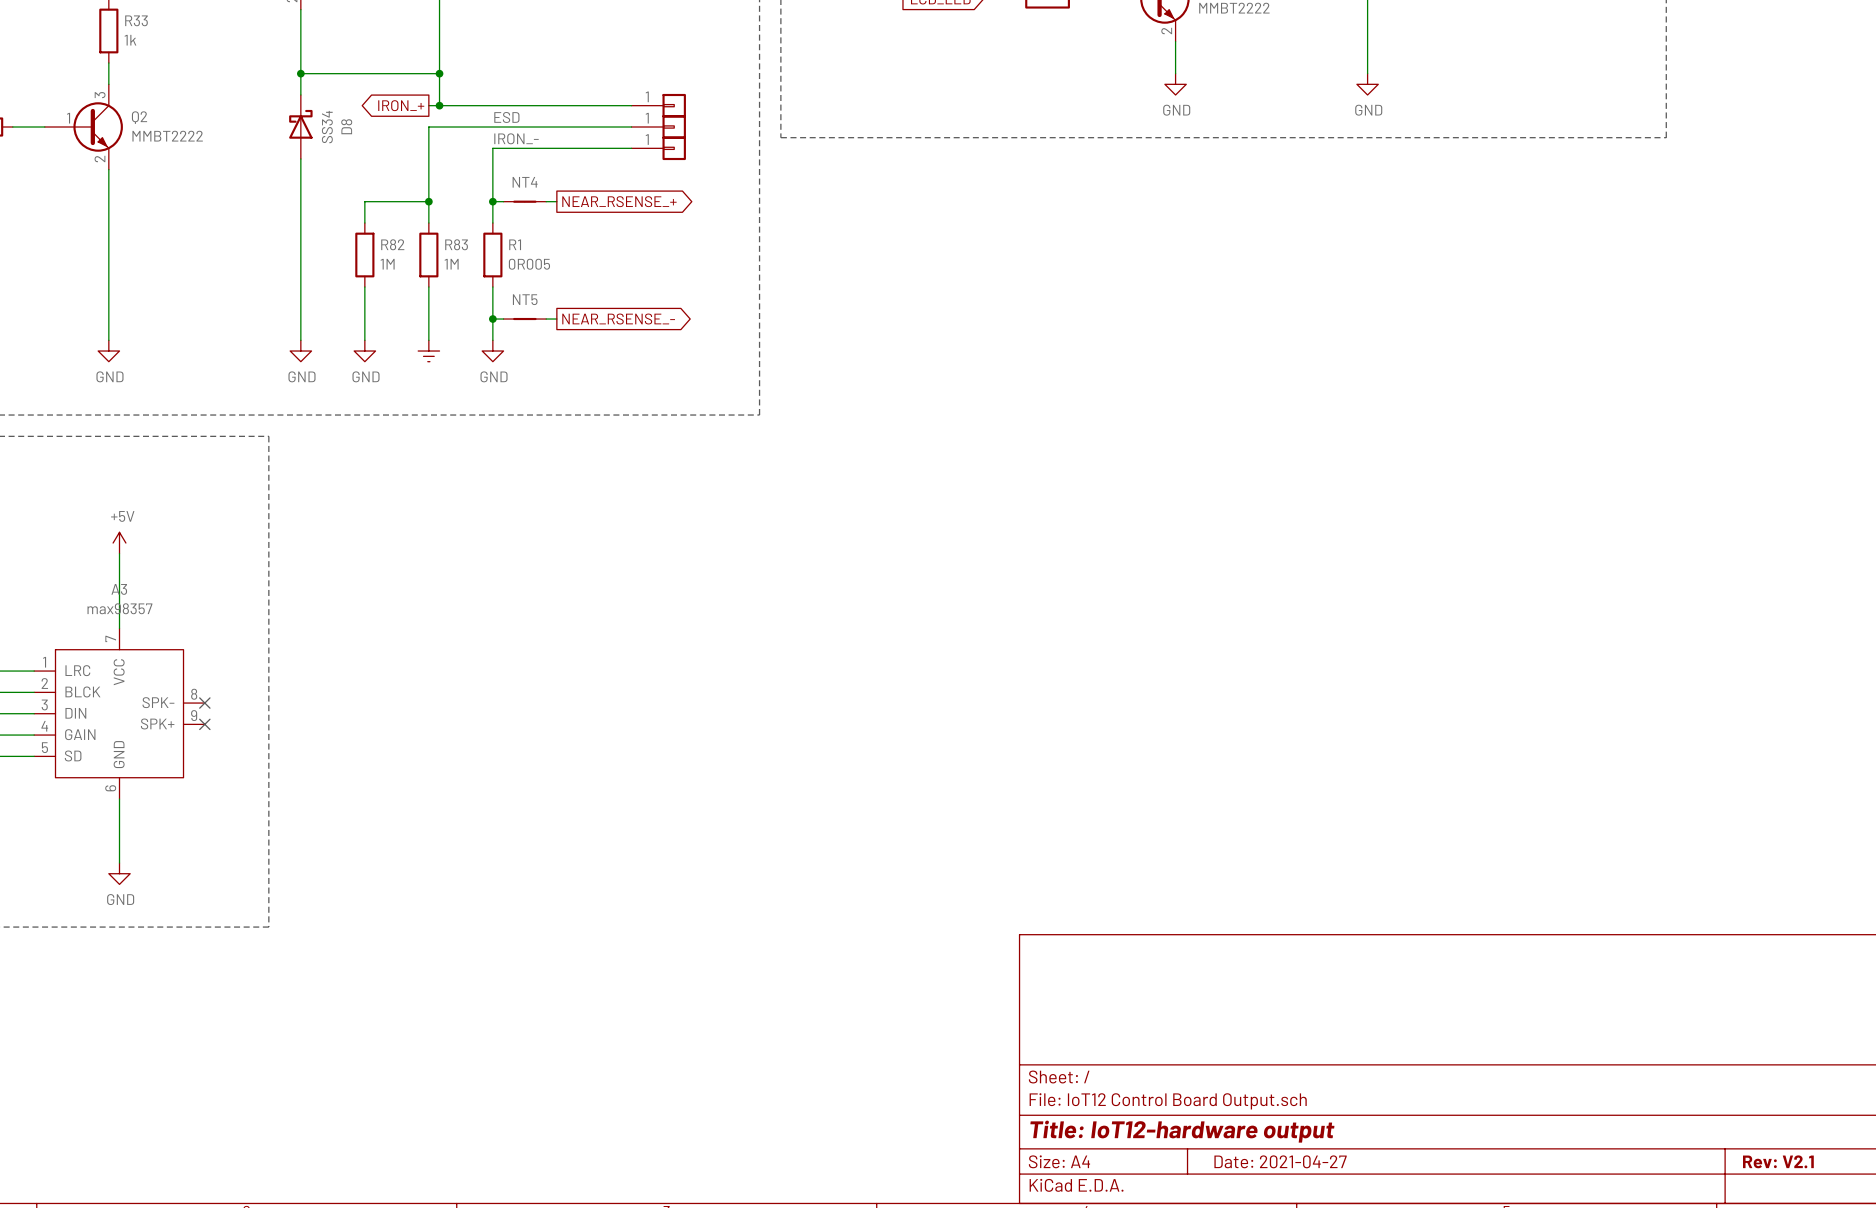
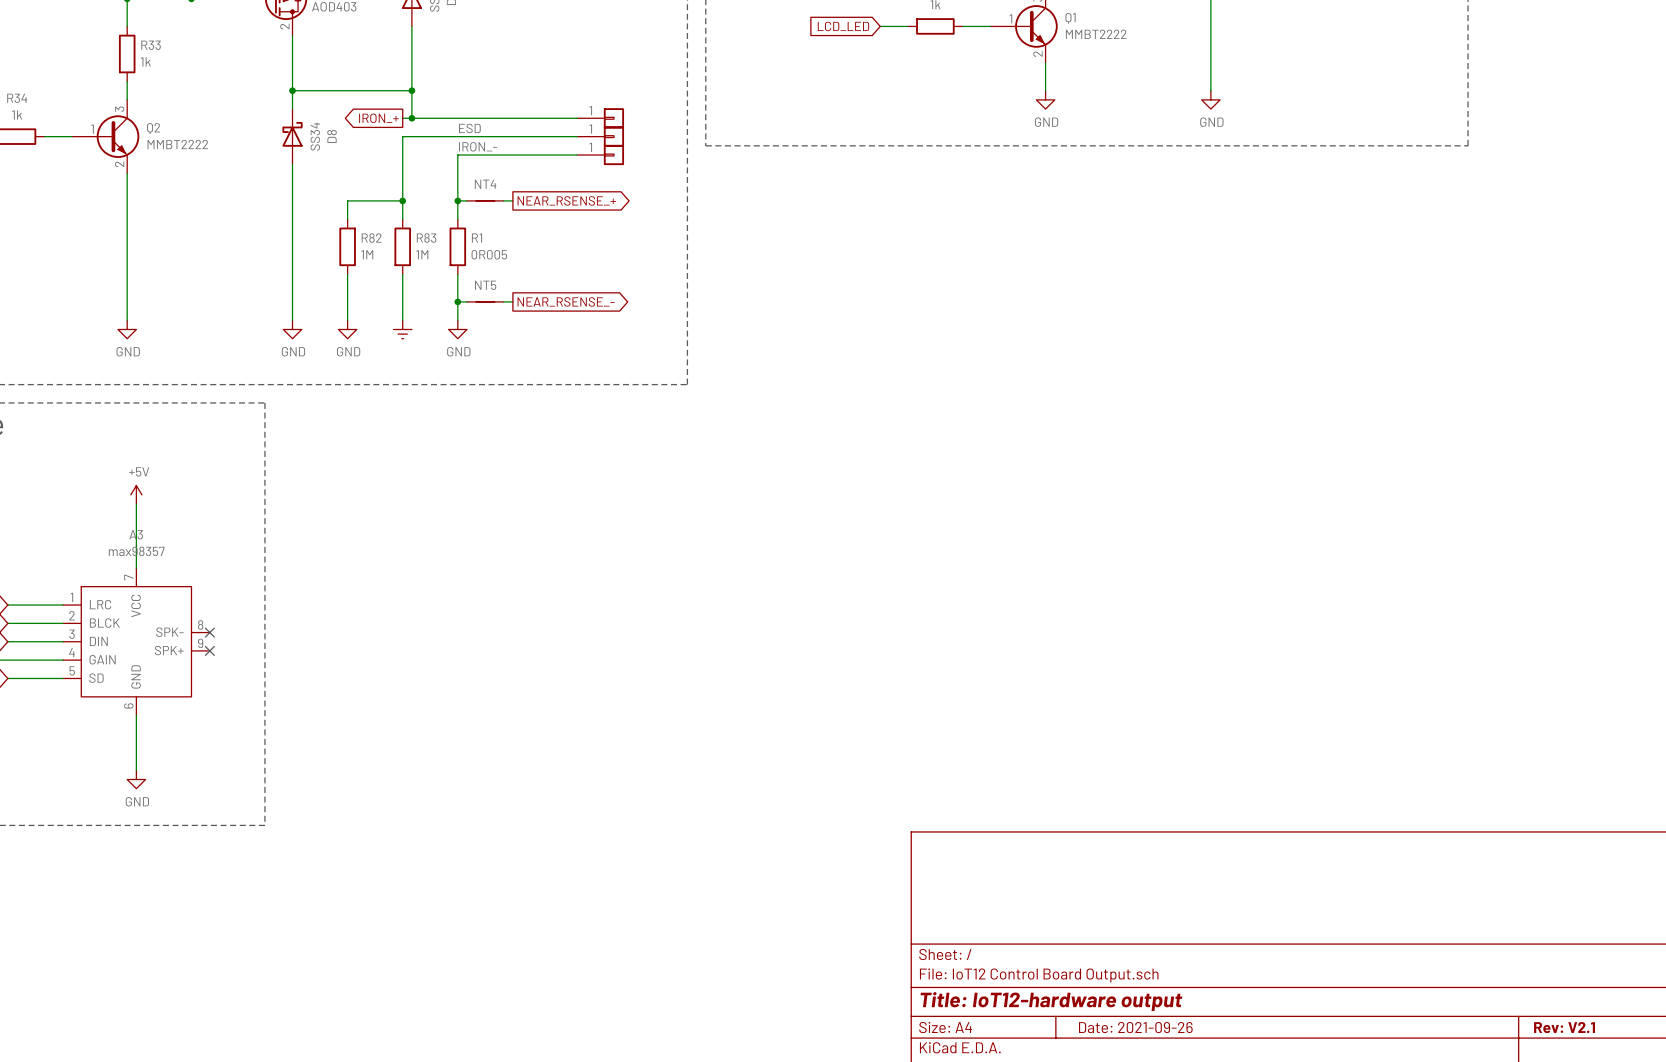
title block: Date: 2021-04-27 (1280, 1161) -> Date: 2021-09-26 (1135, 1027)

